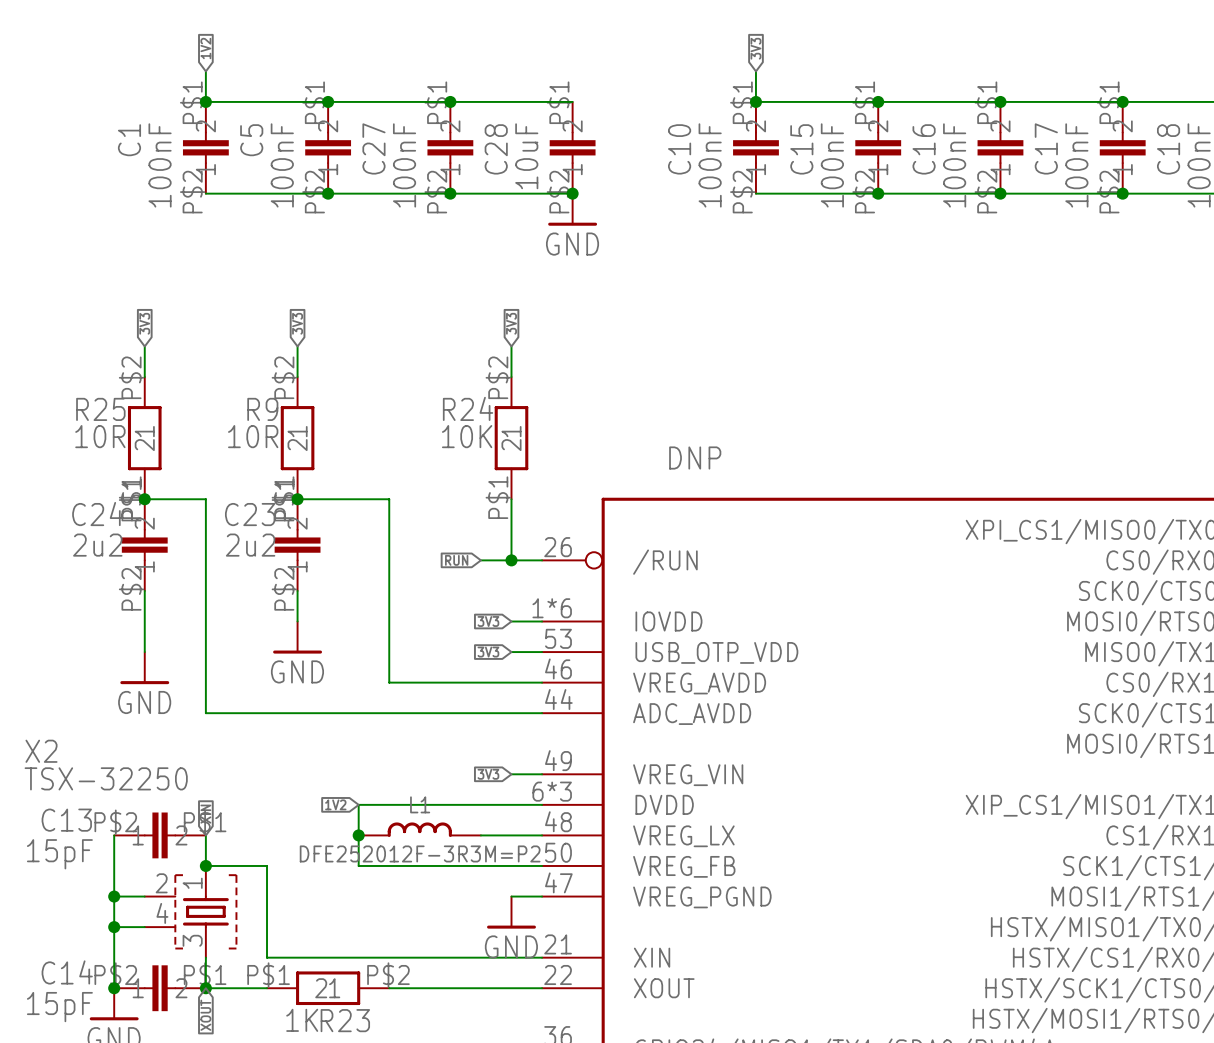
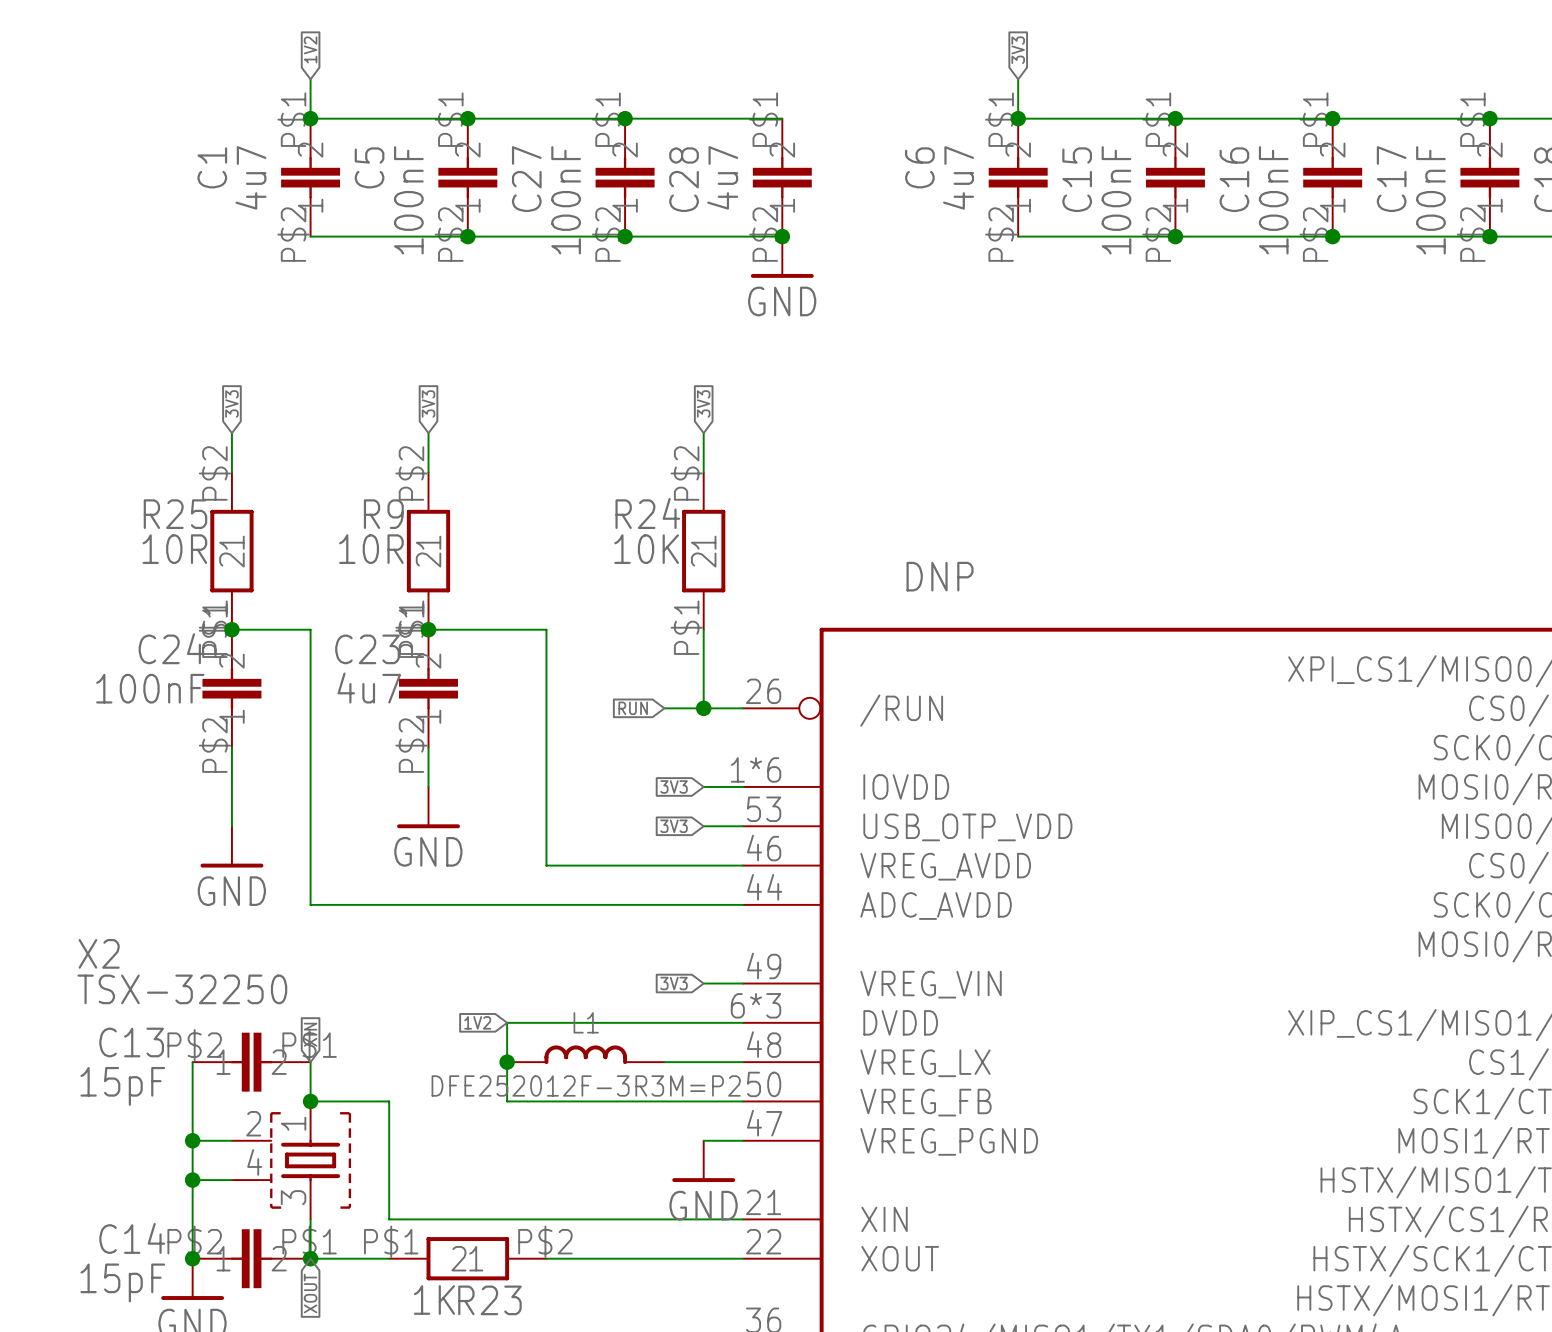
C10 name: C10 (679, 149) -> C6 (919, 167)
C28 value: 10uF (526, 156) -> 4u7 (722, 177)
C1 value: 100nF (160, 165) -> 4u7 (250, 177)
C10 value: 100nF (710, 165) -> 4u7 (958, 177)
C24 value: 2u2 (97, 545) -> 100nF (150, 688)
C23 value: 2u2 (250, 545) -> 4u7 (369, 688)

